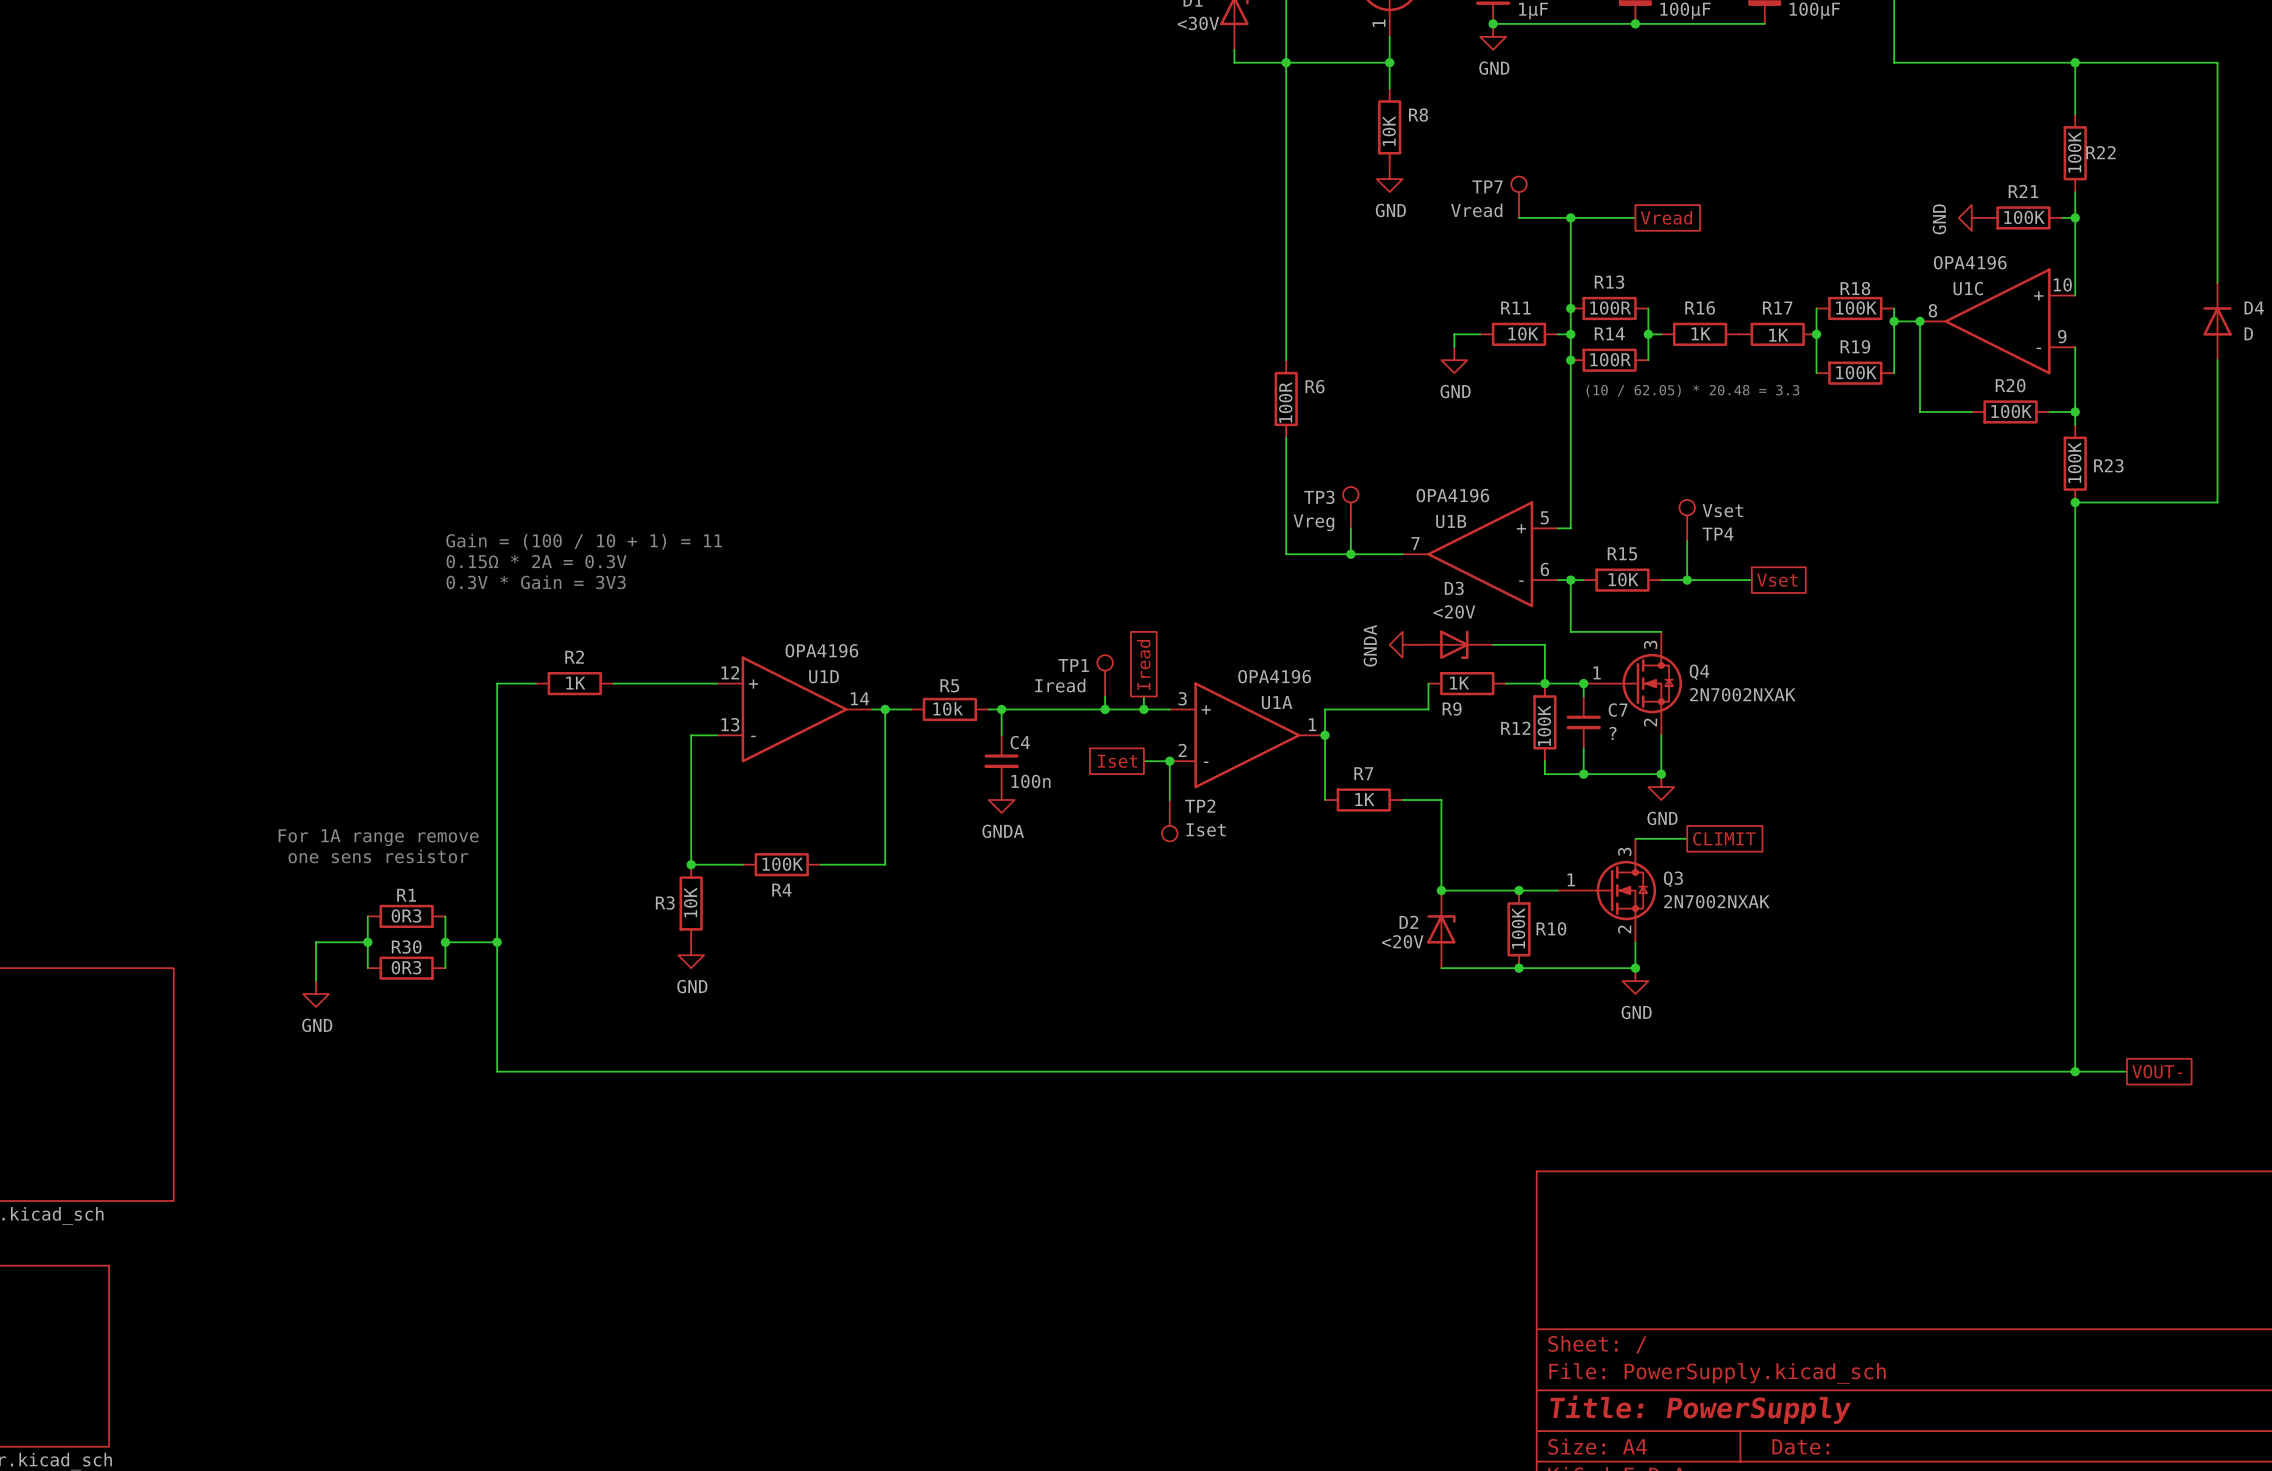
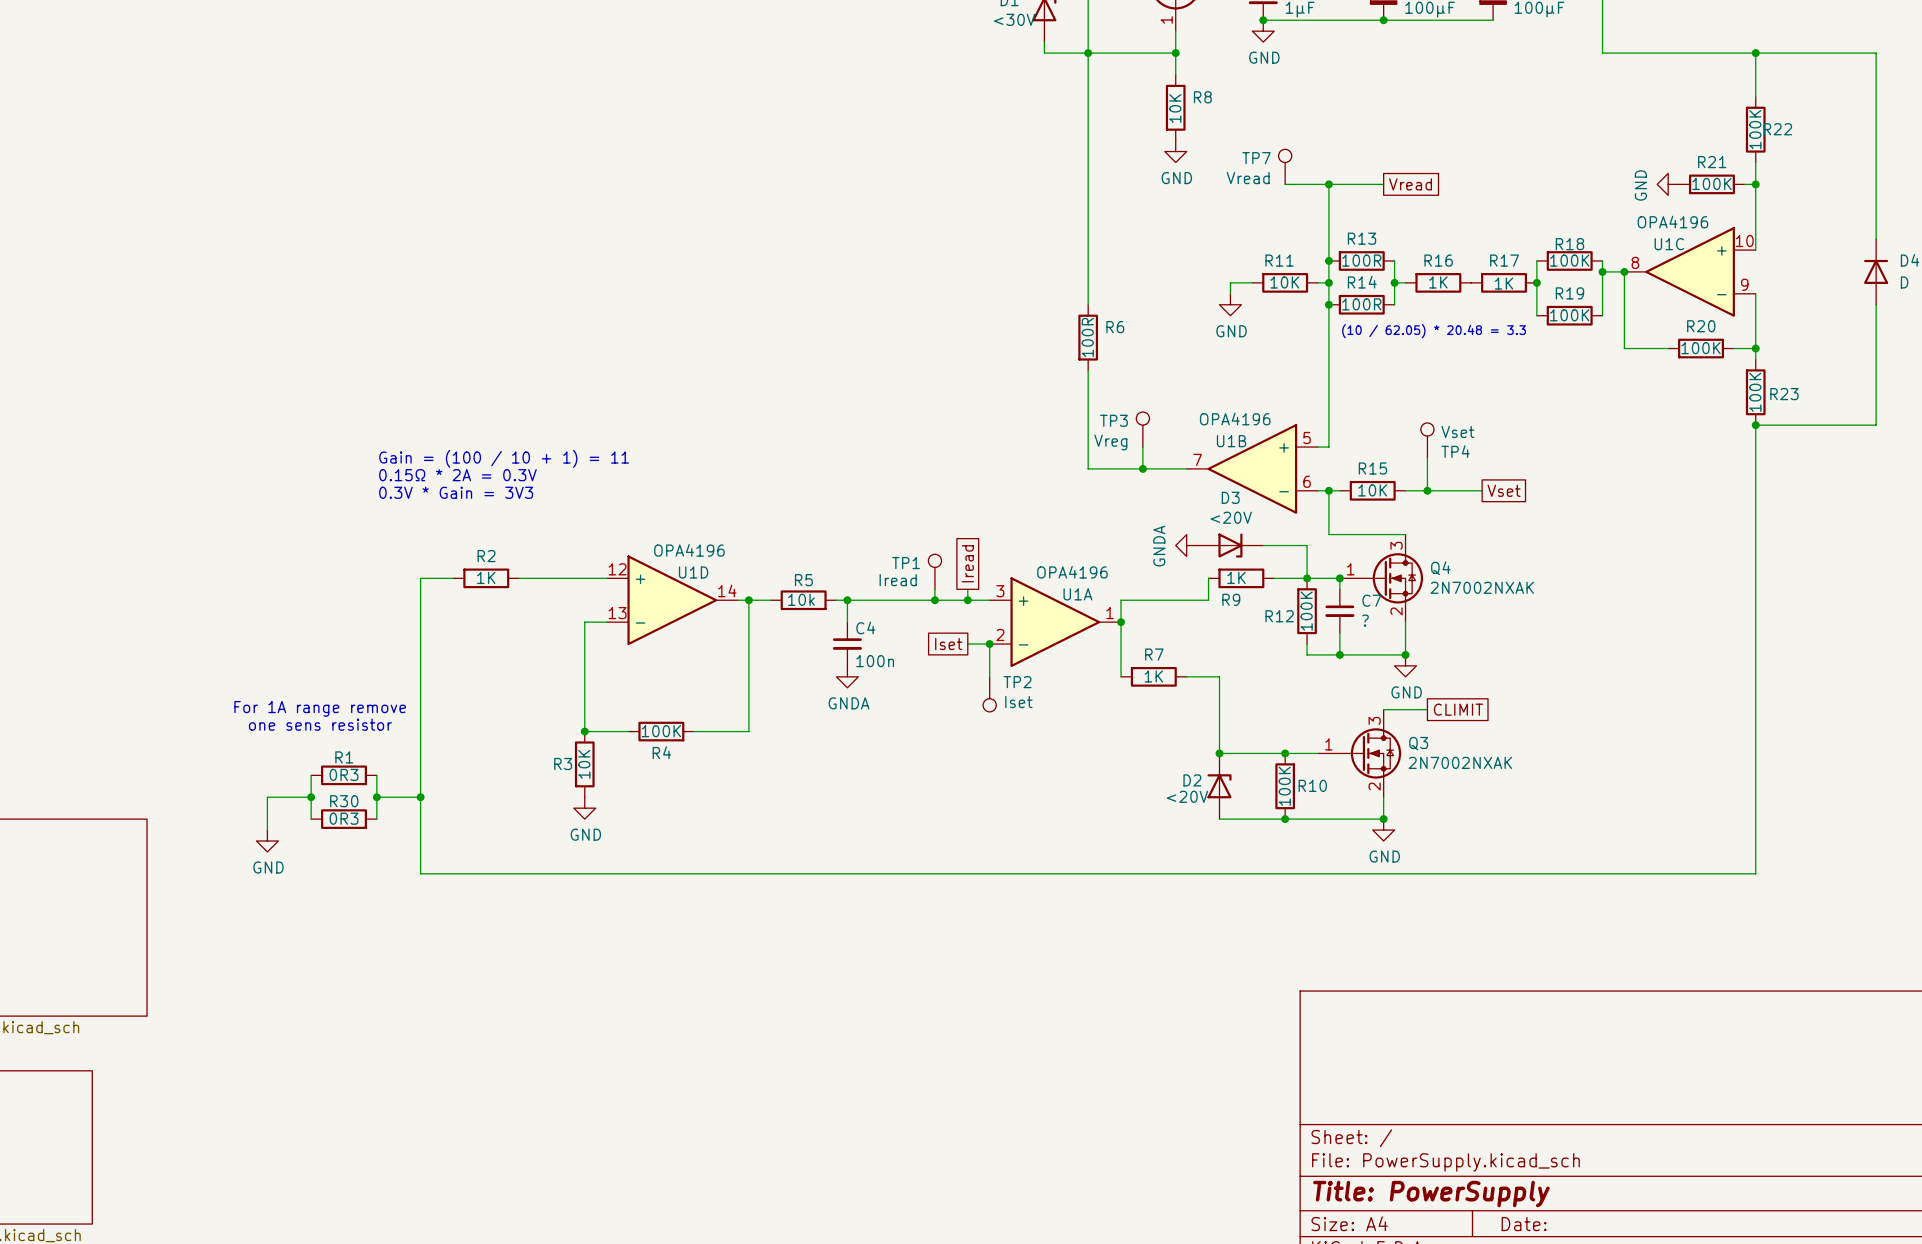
wire: (497, 1032) (497, 1071) (2126, 1071) -> (420, 873) (1755, 873)
wire: (2075, 1032) (2075, 1071) -> none
junction: (2075, 1071) -> none
global label: VOUT- (2157, 1071) -> none

